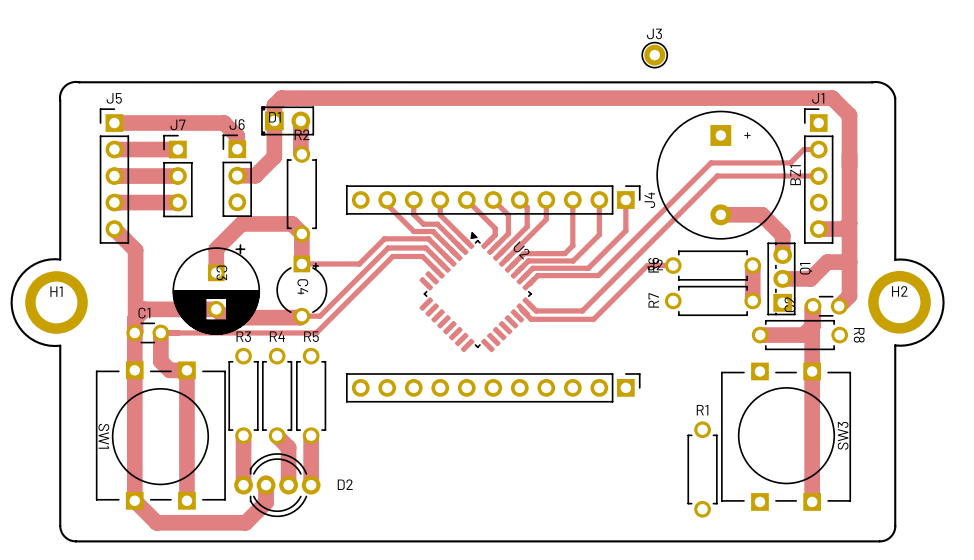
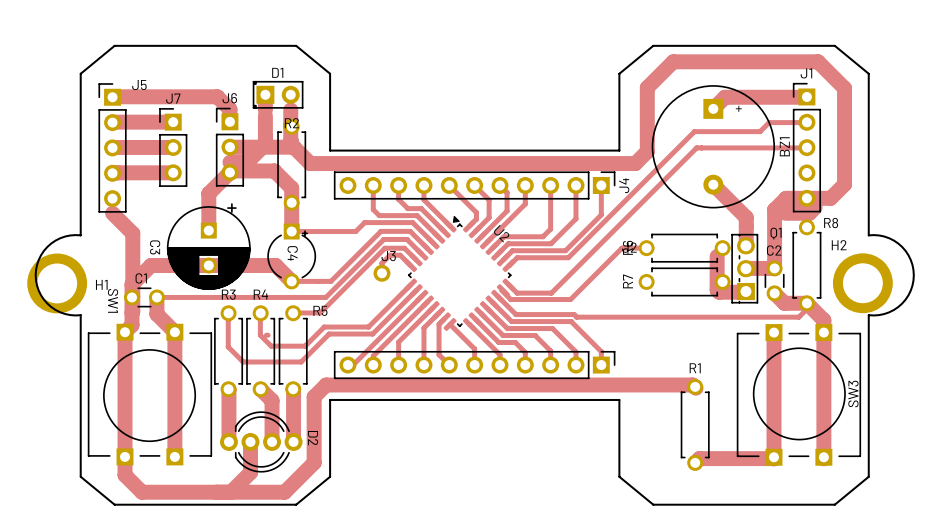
J3 footprint: [641, 41, 668, 69] -> [373, 264, 391, 282]
board edge: none -> (114, 45) (296, 45) (330, 73) (330, 150) (619, 150) (619, 73) (653, 45) (834, 45) (868, 73) (868, 235) (884, 236) (898, 243) (908, 255) (913, 270) (910, 290) (902, 303) (884, 314) (868, 315) (868, 476) (834, 504) (653, 504) (619, 476) (619, 399) (330, 399) (330, 476) (296, 504) (114, 504) (80, 476) (80, 315) (60, 312) (47, 303) (38, 290) (35, 275) (38, 259) (47, 246) (60, 238) (80, 235) (80, 73) (114, 45)
board edge: (79, 82) (874, 82) (884, 84) (890, 88) (895, 98) (895, 259) (915, 262) (929, 270) (940, 287) (943, 302) (940, 317) (929, 334) (915, 342) (895, 345) (895, 525) -> none
board edge: (79, 82) (71, 82) (65, 86) (60, 92) (60, 100) -> none
J5 name position: J5 (114, 98) -> J5 (139, 85)
board edge: (60, 100) (60, 259) (44, 260) (26, 270) (14, 287) (11, 302) (14, 318) (26, 335) (44, 344) (60, 345) (60, 525) (62, 533) (68, 539) (75, 541) (879, 541) -> none
track: none -> (806, 96) (724, 97) (713, 108)
track: (274, 111) (274, 105) (281, 98) (832, 98) (849, 115) (849, 295) (839, 306) -> none
D1 name position: D1 (274, 117) -> D1 (277, 72)
D1 position: (287, 120) -> (278, 94)
track: (114, 123) (224, 123) (237, 136) (237, 149) -> (112, 96) (217, 96) (229, 109) (229, 121)
track: (114, 149) (177, 149) -> (112, 122) (173, 122)
track: (818, 153) (814, 149) (803, 149) (790, 162) (711, 162) (598, 275) (591, 275) -> (806, 122) (769, 122) (760, 131) (694, 131) (568, 257)
track: none -> (229, 147) (293, 147) (310, 163) (635, 163) (647, 151) (647, 87) (673, 61) (818, 61) (844, 88) (844, 184) (830, 198) (786, 198) (774, 209) (774, 268) (746, 267)
J6 position: (237, 175) -> (229, 147)
BZ1 position: (720, 175) -> (713, 146)
track: (114, 176) (177, 176) -> (112, 147) (173, 147)
J5 position: (114, 176) -> (112, 147)
J7 position: (177, 176) -> (173, 147)
J1 position: (818, 176) -> (806, 147)
track: (818, 180) (818, 176) (717, 176) (582, 310) (536, 310) -> (806, 147) (696, 147) (551, 293) (517, 293) (515, 291)
R2 position: (301, 194) -> (291, 164)
track: none -> (713, 184) (746, 217) (746, 245)
track: (114, 202) (177, 202) -> (112, 172) (173, 172)
track: (387, 204) (413, 231) -> (373, 190) (373, 209) (379, 215) (398, 215)
track: (720, 214) (762, 214) (782, 235) (782, 255) -> none
track: (301, 233) (292, 223) (241, 223) (216, 249) (216, 270) -> (291, 217) (291, 188) (274, 170) (231, 170) (208, 193) (208, 230)
track: (384, 238) (359, 263) (301, 263) (301, 248) -> (370, 222) (364, 222) (355, 231) (291, 231)
Q1 footprint: [767, 242, 796, 316] -> [731, 234, 759, 304]
track: (395, 248) (388, 248) (320, 316) (224, 317) (216, 309) (144, 309) (134, 319) -> (380, 231) (330, 281) (291, 281) (275, 265) (151, 265) (131, 284) (131, 299)
track: (398, 256) (392, 256) (316, 333) -> none
track: (849, 262) (827, 262) (810, 278) (782, 278) -> none
track: (752, 265) (752, 300) -> none
Q1 name rotation: 0° (805, 268) -> 90° clockwise (776, 233)
C3 name position: C3 (221, 272) -> C3 (155, 247)
track: none -> (717, 256) (717, 290) (719, 292) (745, 291)
track: none -> (416, 259) (404, 248) (384, 248) (320, 312) (299, 312)
track: none -> (410, 265) (400, 255) (390, 255) (381, 263) (381, 273)
C3 position: (216, 289) -> (208, 246)
C4 position: (301, 290) -> (291, 256)
H1 name position: H1 (56, 291) -> H1 (101, 284)
H2 name position: H2 (899, 291) -> H2 (839, 245)
track: none -> (410, 284) (368, 327) (324, 327) (305, 346) (271, 346) (260, 335) (260, 312)
track: (813, 306) (813, 325) (803, 335) (760, 335) -> none
C2 rotation: 0° (826, 306) -> 90° clockwise (774, 280)
track: (812, 307) (812, 501) -> none
track: none -> (416, 290) (372, 334) (329, 334) (301, 361) (243, 361) (228, 347) (228, 312)
track: none -> (774, 293) (784, 303) (806, 303)
track: none -> (421, 296) (353, 365) (347, 365)
track: none -> (497, 296) (516, 314) (574, 314) (576, 317) (798, 317) (806, 309) (806, 303)
track: none -> (427, 301) (373, 356) (373, 365)
track: none -> (492, 301) (511, 321) (571, 321) (601, 351) (601, 365)
track: none -> (806, 303) (823, 320) (823, 458)
track: none -> (433, 307) (398, 342) (398, 365)
track: none -> (486, 307) (507, 328) (552, 328) (575, 351) (575, 365)
C1 position: (147, 332) -> (144, 297)
track: (160, 332) (316, 332) -> (156, 312) (156, 297) (325, 297) (383, 239)
track: none -> (438, 313) (423, 328) (423, 365)
track: none -> (480, 313) (503, 335) (535, 335) (550, 350) (550, 365)
track: (160, 334) (160, 361) (169, 370) (186, 370) (186, 494) -> (156, 314) (174, 332) (174, 450)
R8 rotation: 0° (799, 335) -> 90° clockwise (806, 265)
R8 position: (799, 335) -> (806, 265)
R8 name position: R8 (859, 335) -> R8 (831, 223)
R5 name position: R5 (311, 336) -> R5 (320, 310)
track: none -> (444, 318) (439, 324) (439, 354) (449, 365)
track: none -> (475, 318) (498, 342) (515, 342) (525, 352) (525, 365)
track: none -> (450, 324) (474, 349) (474, 365)
track: none -> (469, 324) (499, 354) (499, 365)
track: (134, 346) (134, 494) -> (131, 325) (125, 332) (125, 450)
track: none -> (773, 334) (773, 458) (699, 458) (695, 462)
R3 position: (243, 395) -> (228, 351)
R4 position: (277, 395) -> (260, 351)
R5 position: (311, 395) -> (293, 351)
track: none -> (695, 388) (692, 385) (326, 385) (314, 396) (314, 462) (284, 492) (142, 492) (125, 475) (125, 456)
track: none -> (228, 389) (228, 440)
track: none -> (260, 389) (272, 400) (272, 440)
track: none -> (293, 389) (293, 440)
SW1 position: (160, 435) -> (149, 394)
SW1 name position: SW1 (103, 436) -> SW1 (113, 300)
track: (243, 436) (243, 483) -> none
track: (277, 436) (288, 447) (288, 483) -> none
track: (311, 436) (311, 483) -> none
SW3 position: (786, 436) -> (798, 394)
track: none -> (250, 441) (250, 472) (230, 492)
R1 position: (702, 469) -> (695, 424)
track: (266, 483) (266, 502) (245, 522) (156, 522) (134, 500) -> none
D2 name rotation: 0° (345, 484) -> 90° clockwise (313, 438)
D2 position: (277, 485) -> (261, 441)
board edge: (895, 525) (890, 536) (879, 541) -> none

